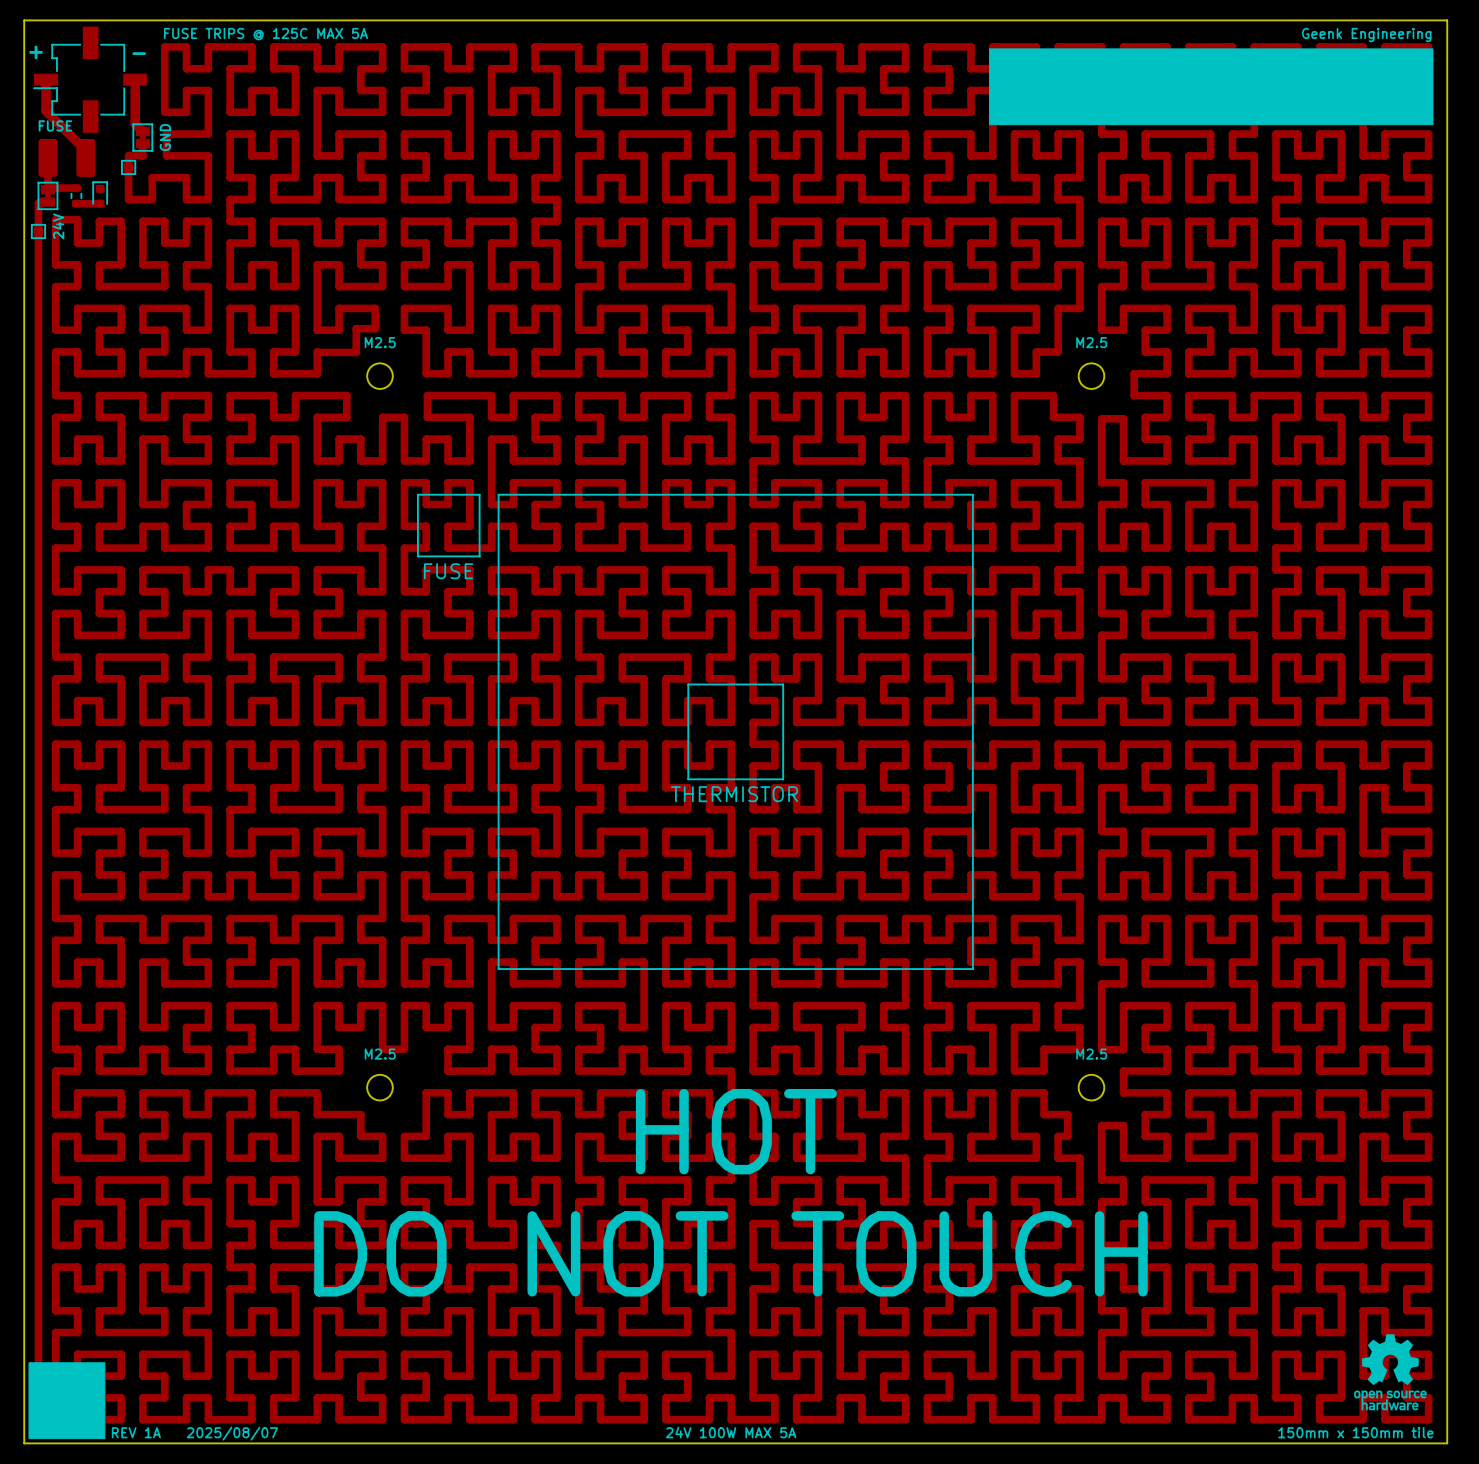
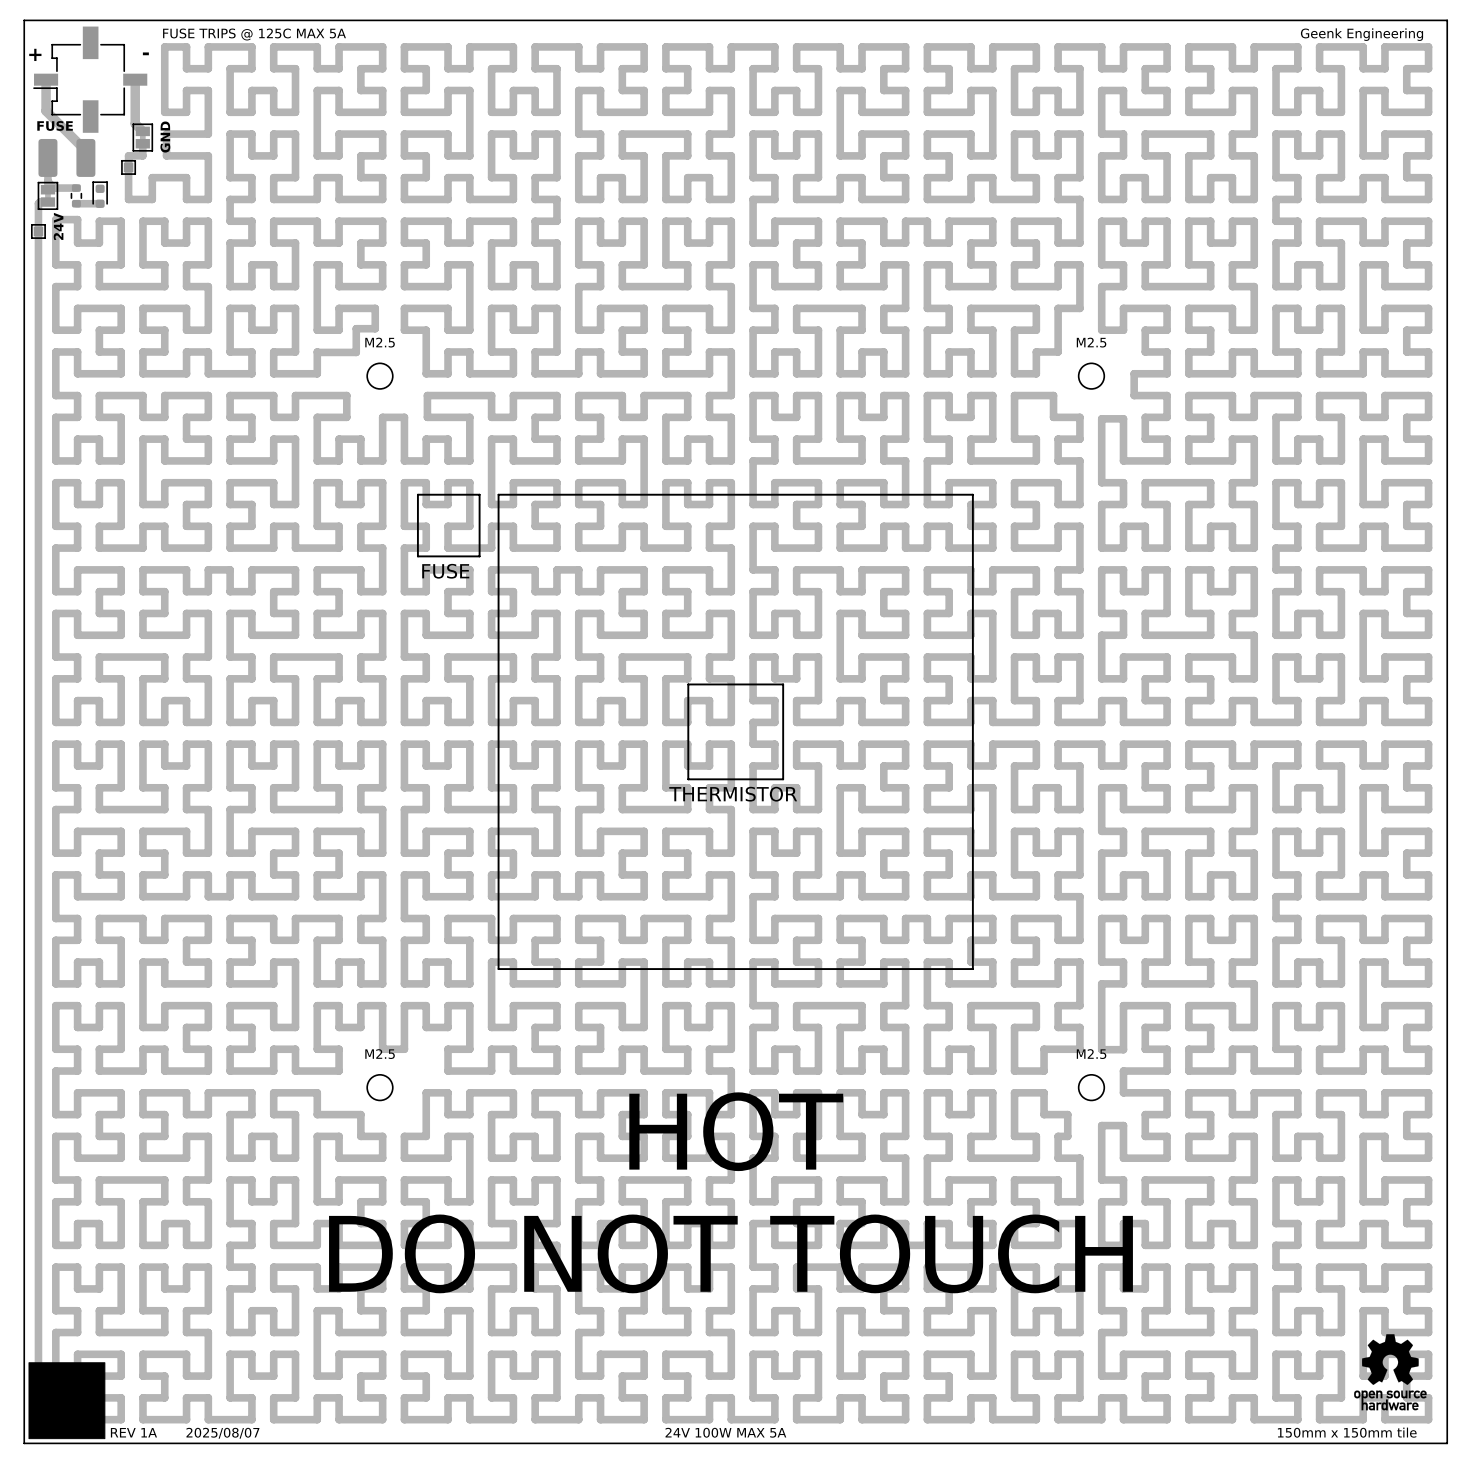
drawing: [989, 48, 1434, 126] -> none

